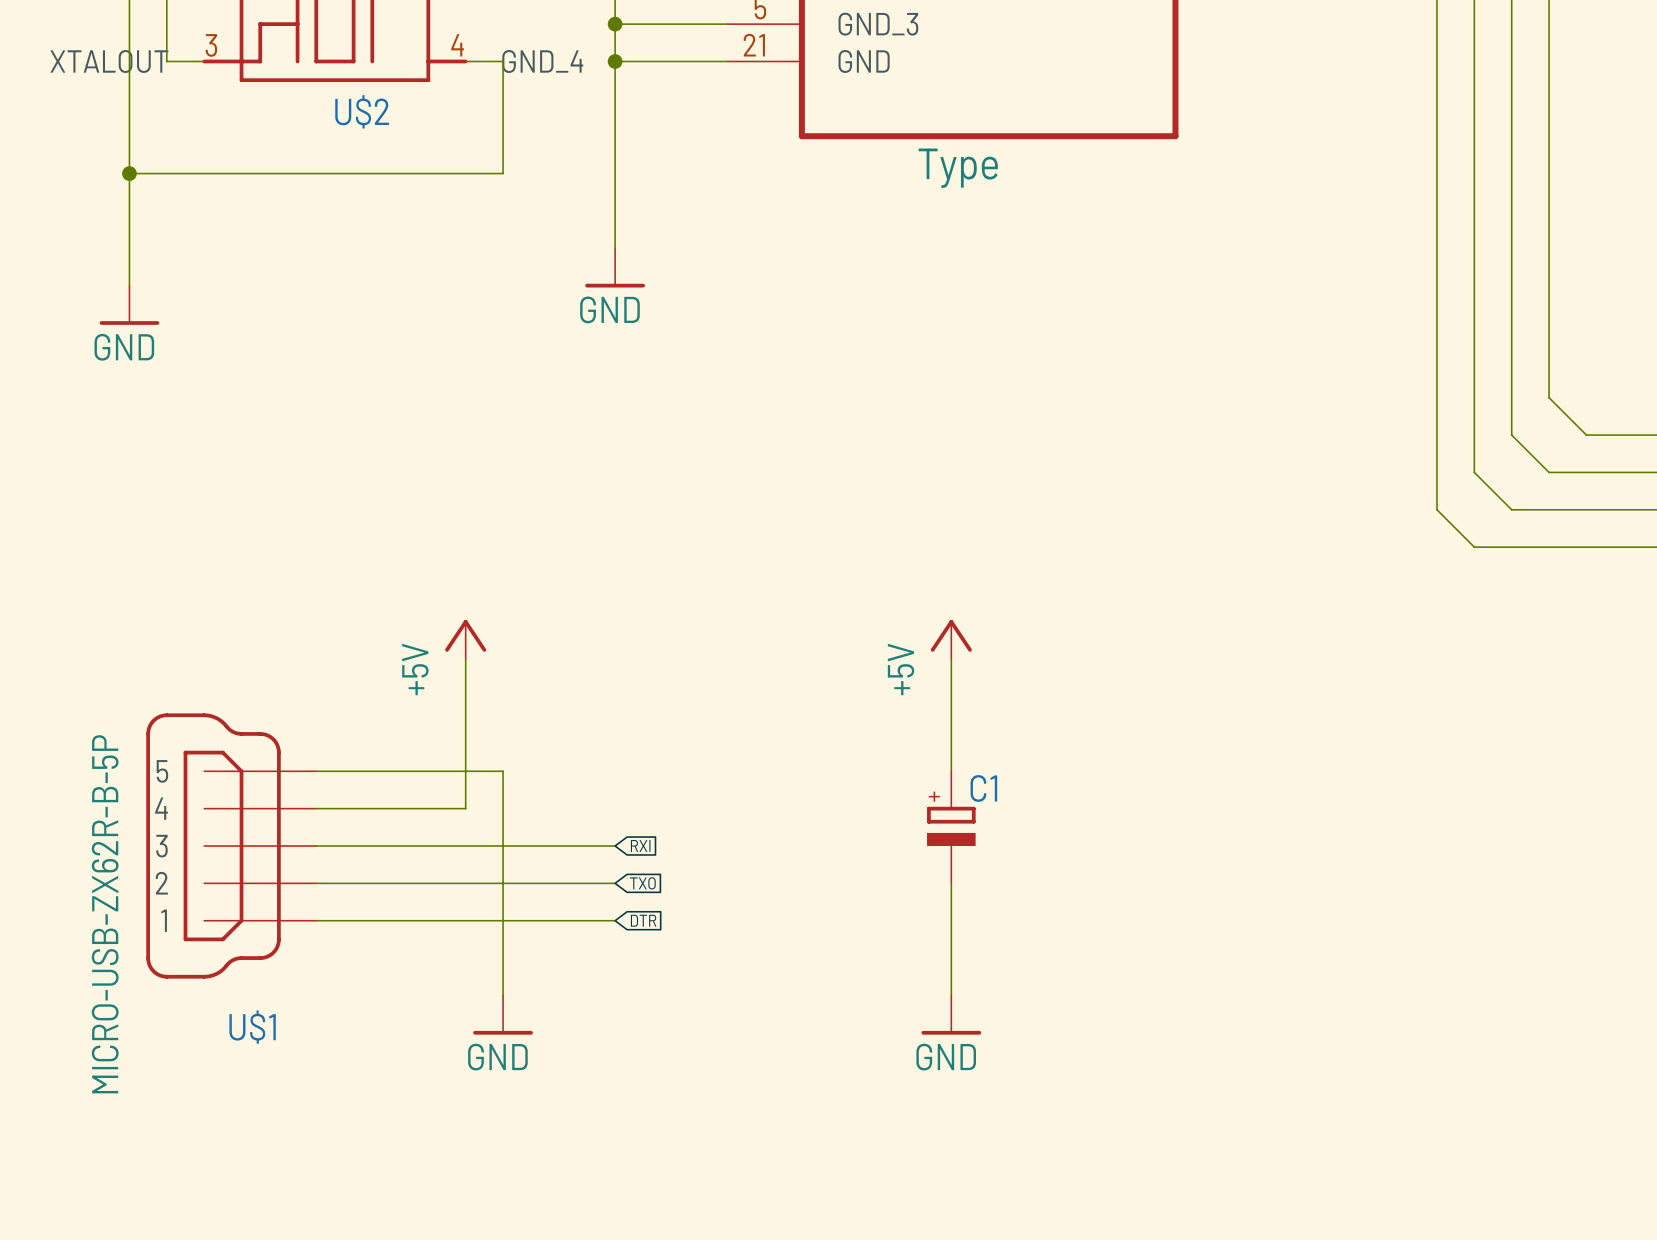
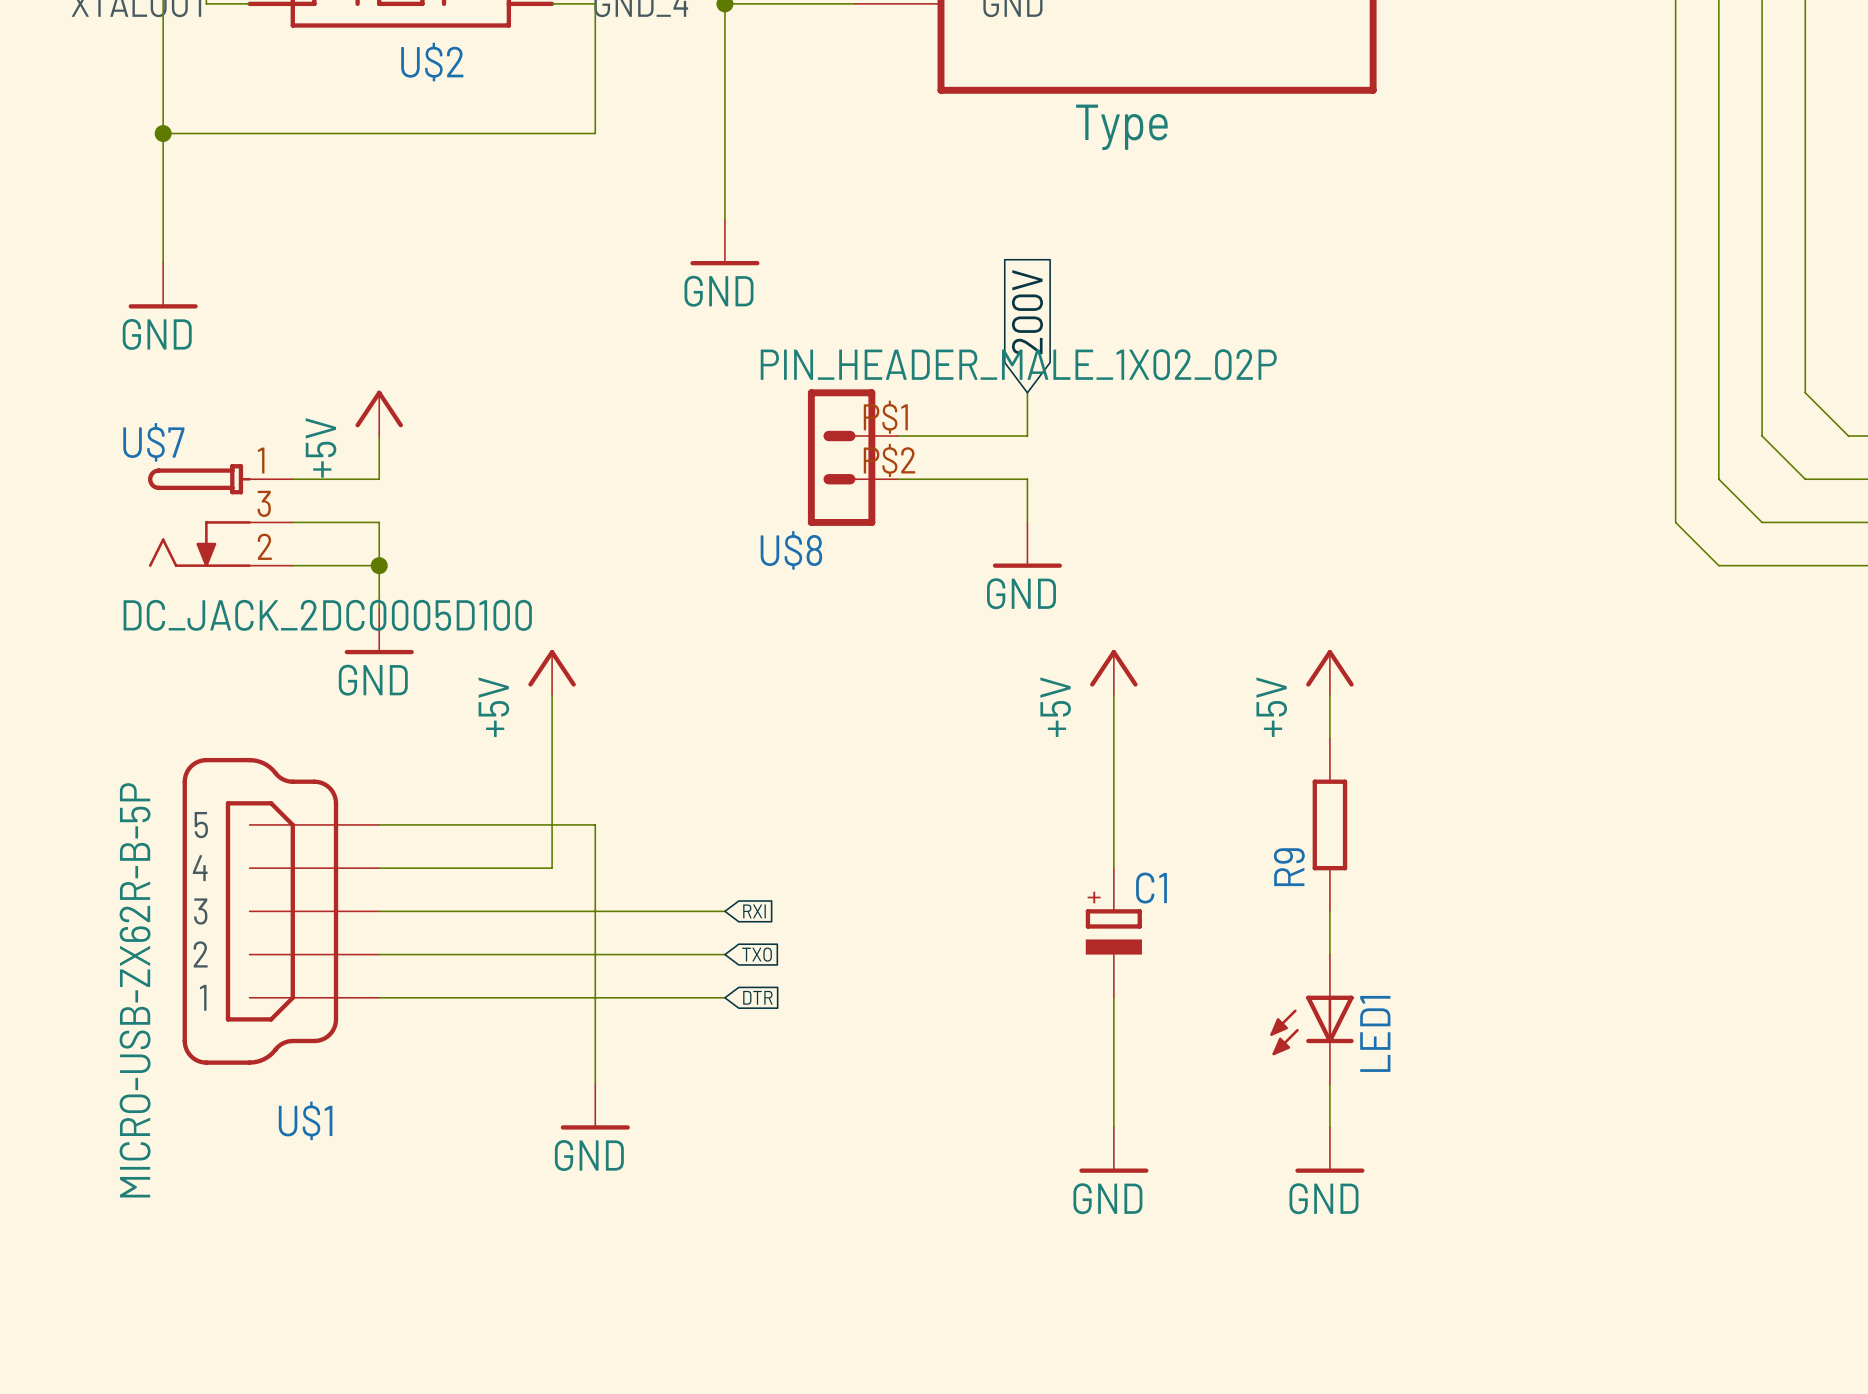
global label: none -> 200V (1027, 312)
wire: none -> (1027, 392) (1027, 436) (897, 436)
power symbol: none -> +5V (379, 413)
wire: none -> (379, 436) (379, 479) (292, 479)
U$8: none -> PIN_HEADER_MALE_1X02_02P (852, 457)
wire: none -> (897, 479) (1027, 479) (1027, 522)
U$7: none -> DC_JACK_2DC0005D100 (220, 515)
wire: none -> (292, 522) (379, 522) (379, 608)
power symbol: none -> GND (1027, 545)
wire: none -> (292, 565) (379, 565)
junction: none -> (379, 565)
power symbol: none -> GND (379, 631)
power symbol: none -> +5V (1329, 672)
wire: none -> (1329, 695) (1329, 738)
R9: none -> (1329, 824)
C1 position: (951, 827) -> (1113, 932)
wire: none -> (1329, 911) (1329, 954)
LED1: none -> (1311, 1019)
wire: none -> (1329, 1084) (1329, 1127)
power symbol position: GND (951, 1015) -> GND (1113, 1150)
power symbol: none -> GND (1329, 1150)

